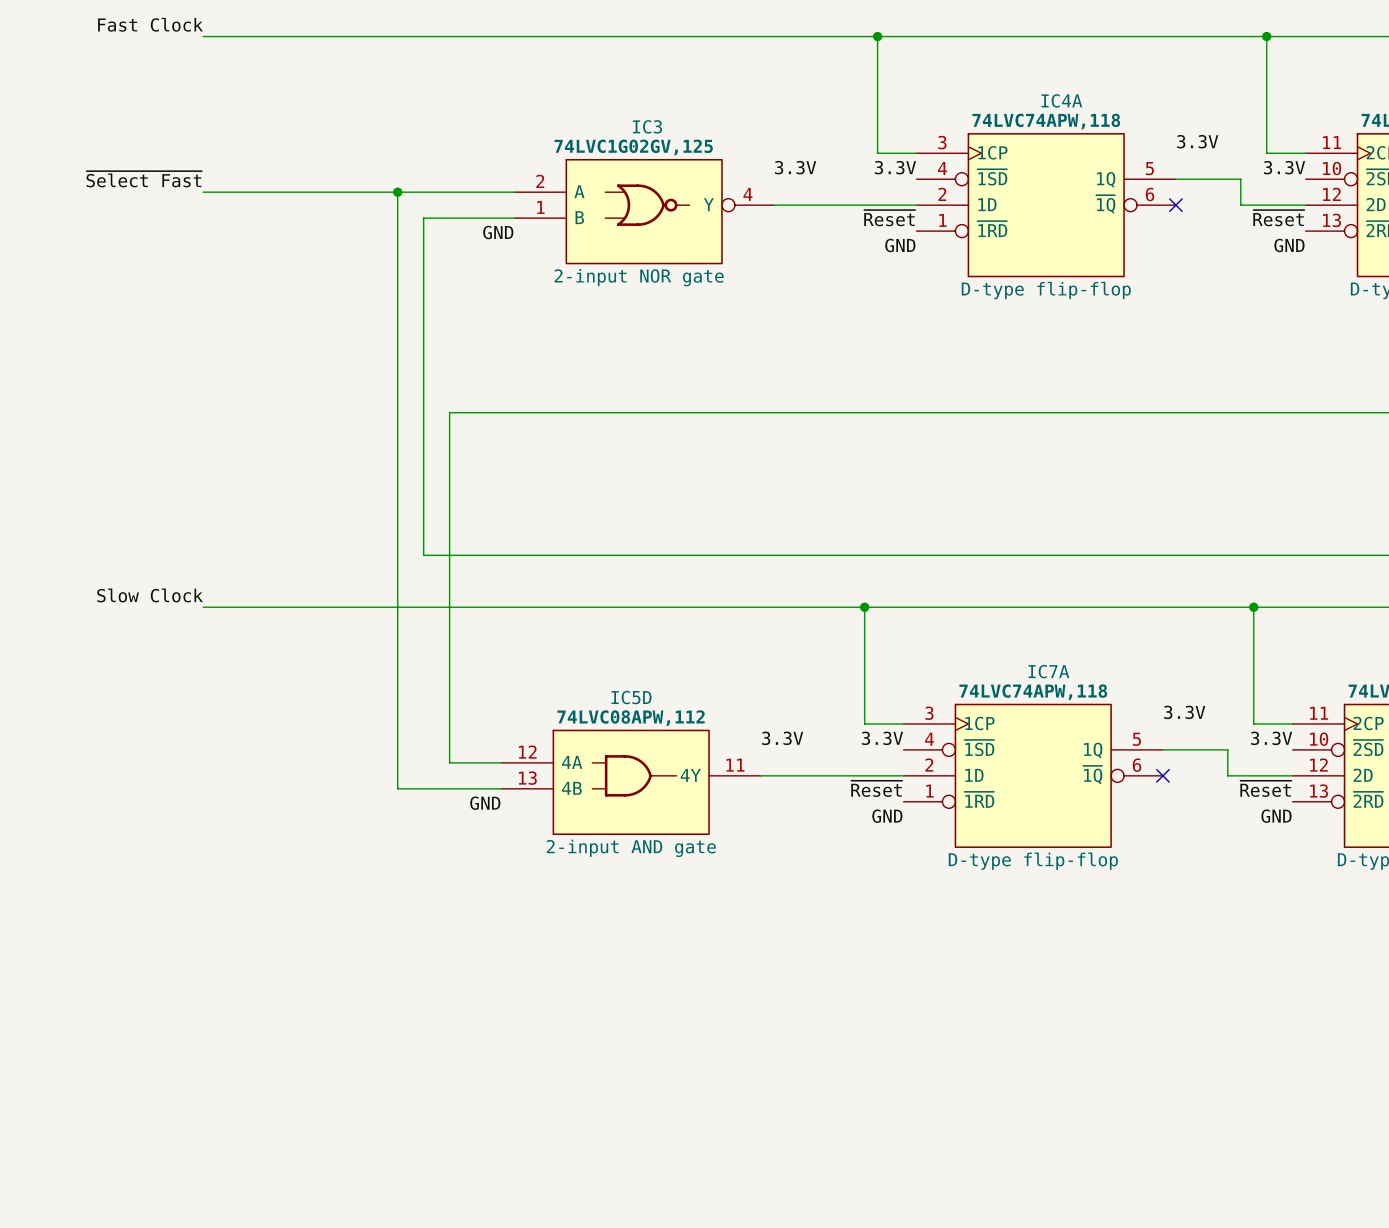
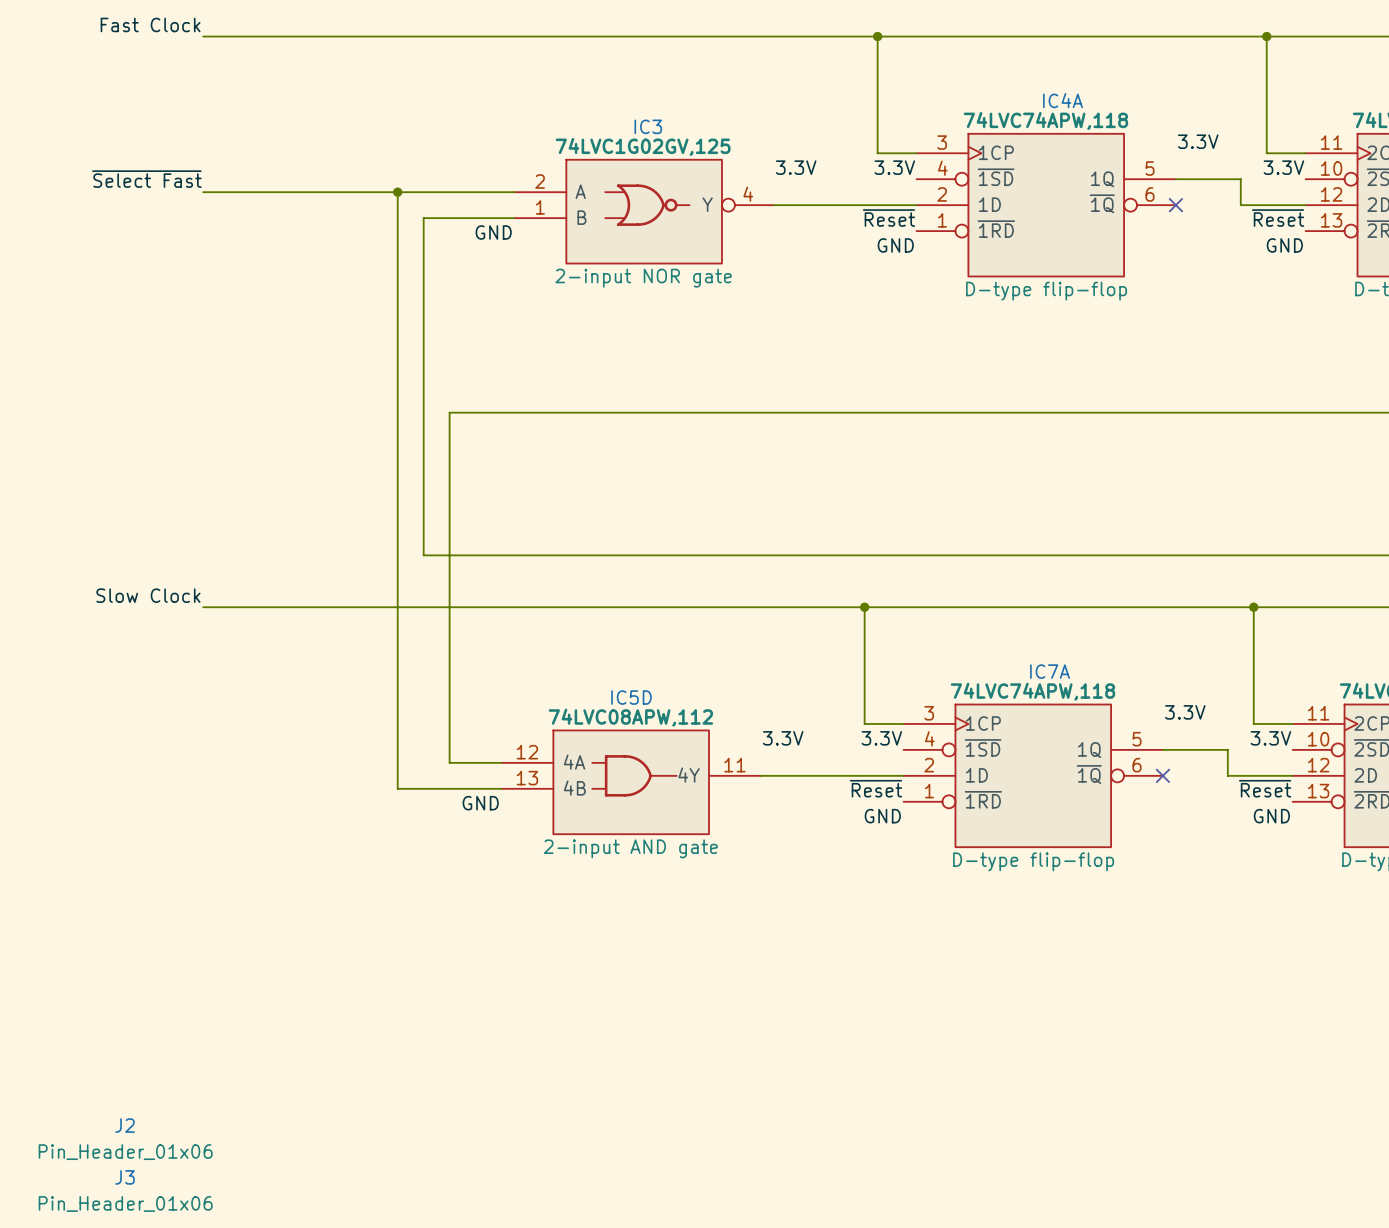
J2: none -> Pin_Header_01x06 (125, 1139)
J3: none -> Pin_Header_01x06 (125, 1191)

